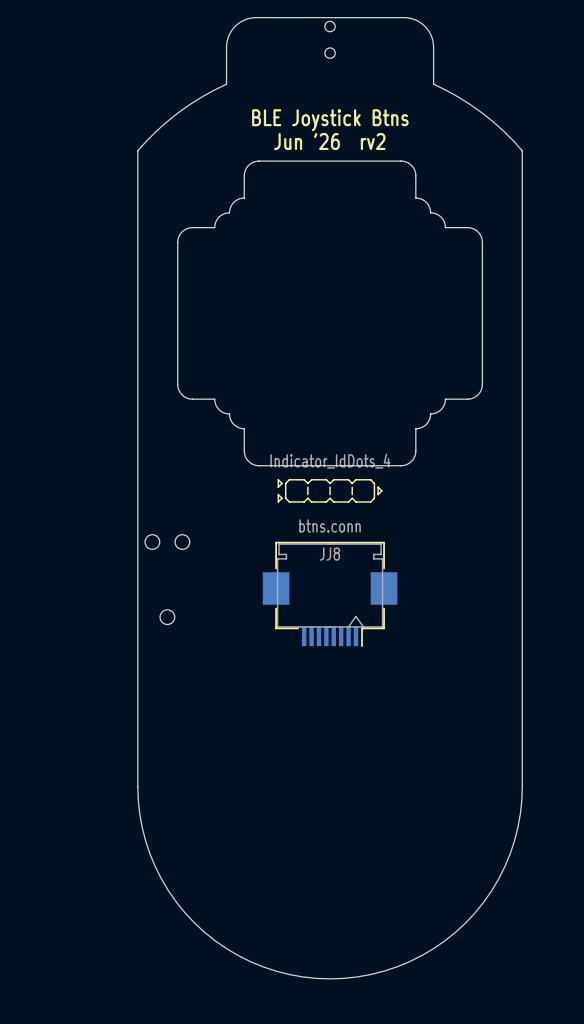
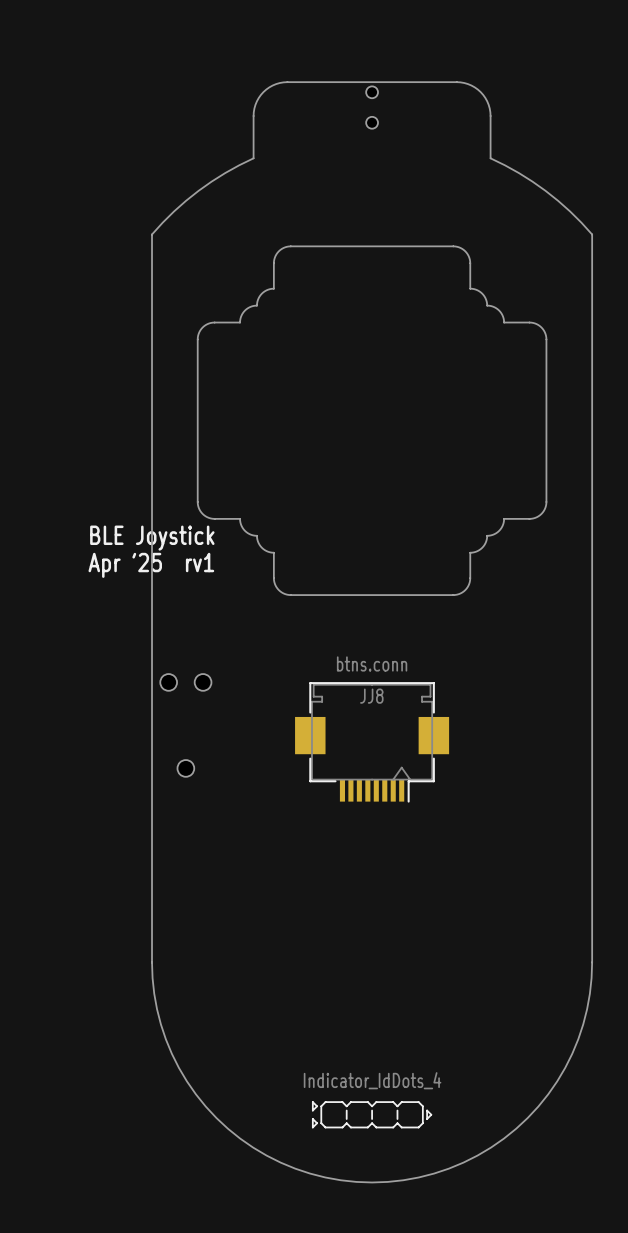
text: BLE Joystick Btns (330, 120) -> none
text: Jun '26 rv2 (329, 141) -> none
text: none -> BLE Joystick (152, 538)
text: none -> Apr '25 rv1 (151, 565)
drawing: [277, 479, 383, 503] -> none
drawing: none -> [311, 1101, 433, 1129]

